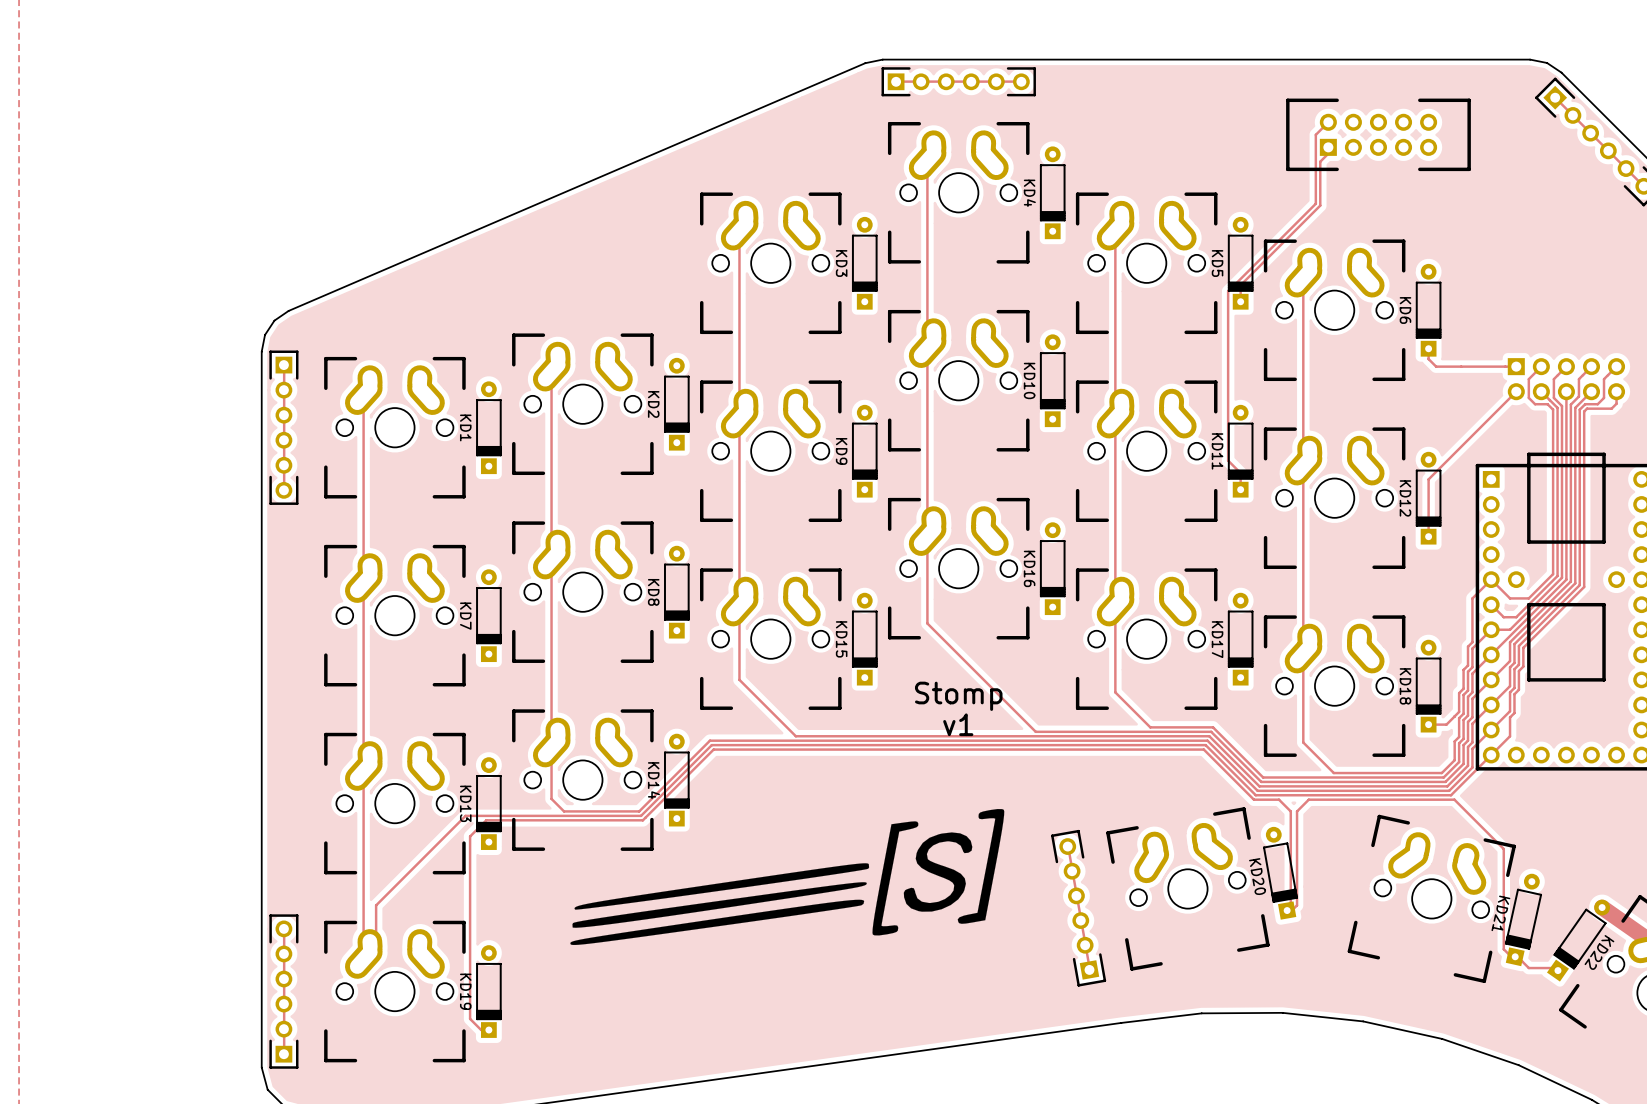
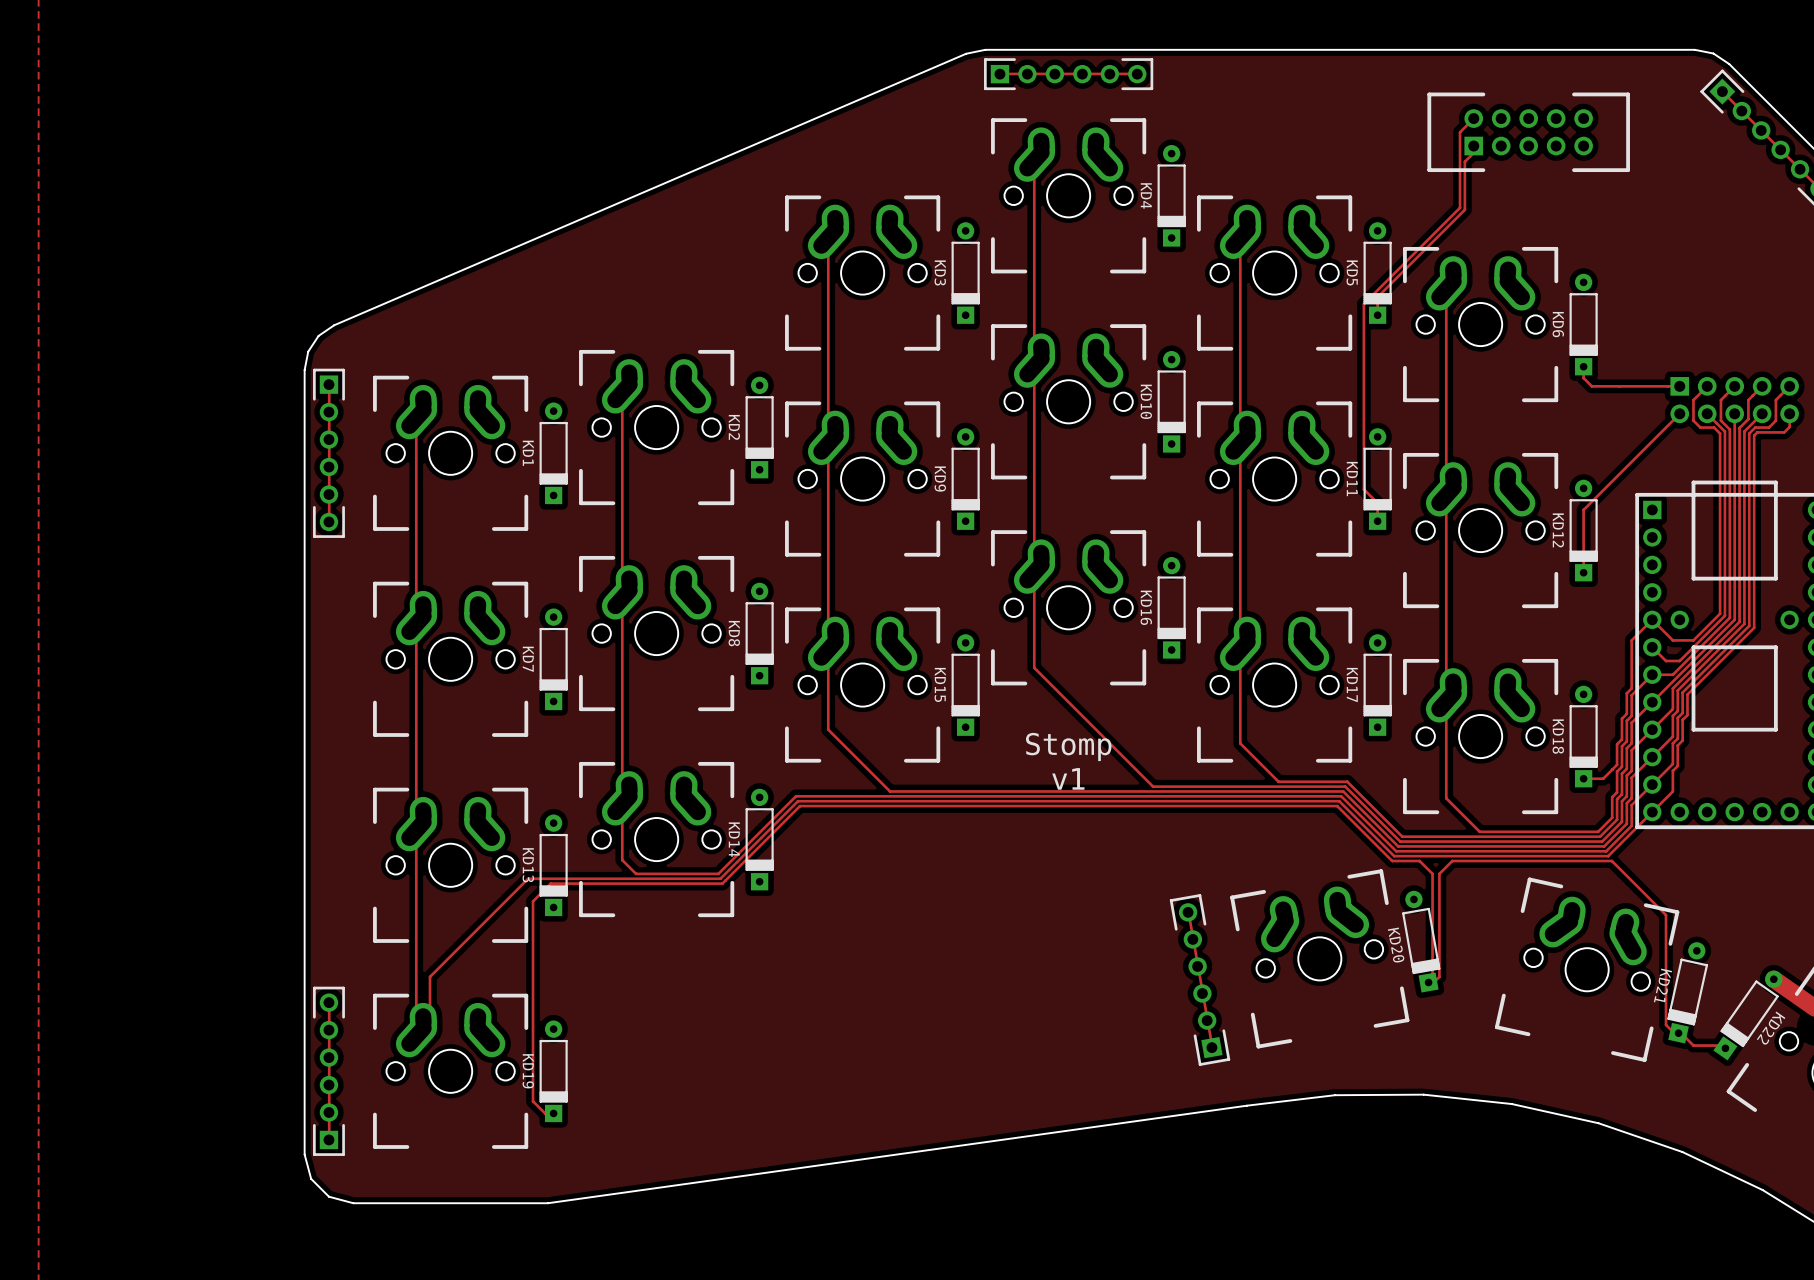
drawing: [570, 809, 1005, 945] -> none

